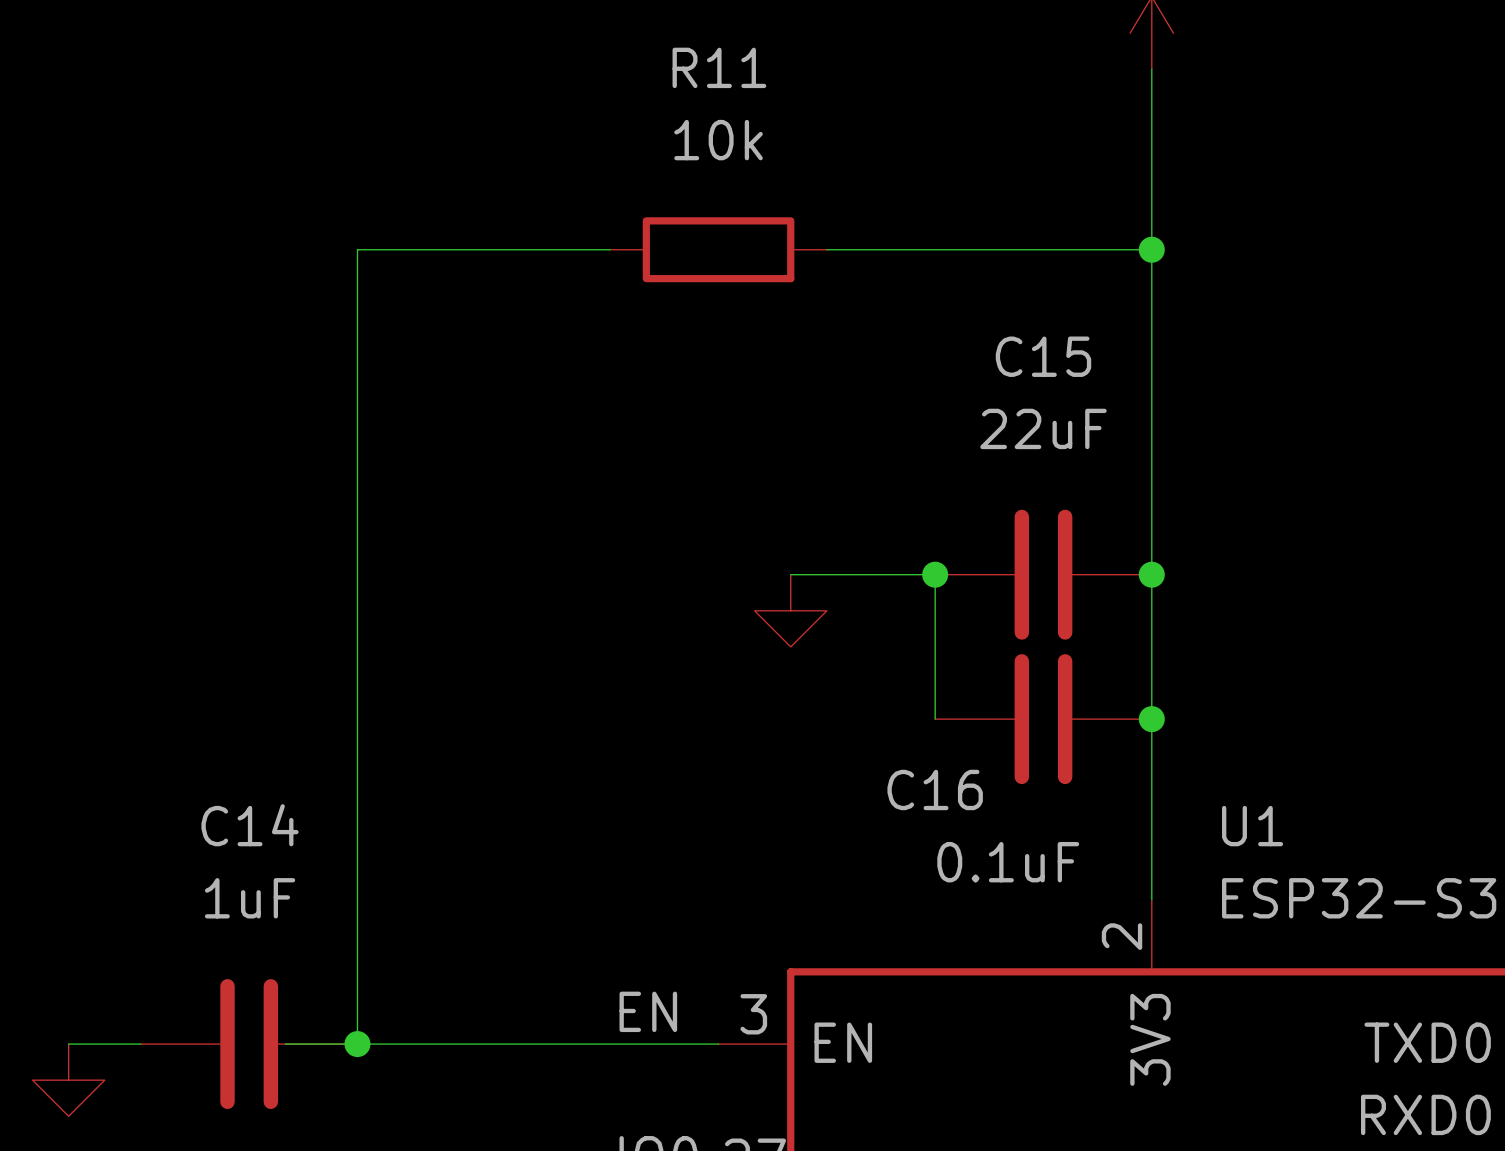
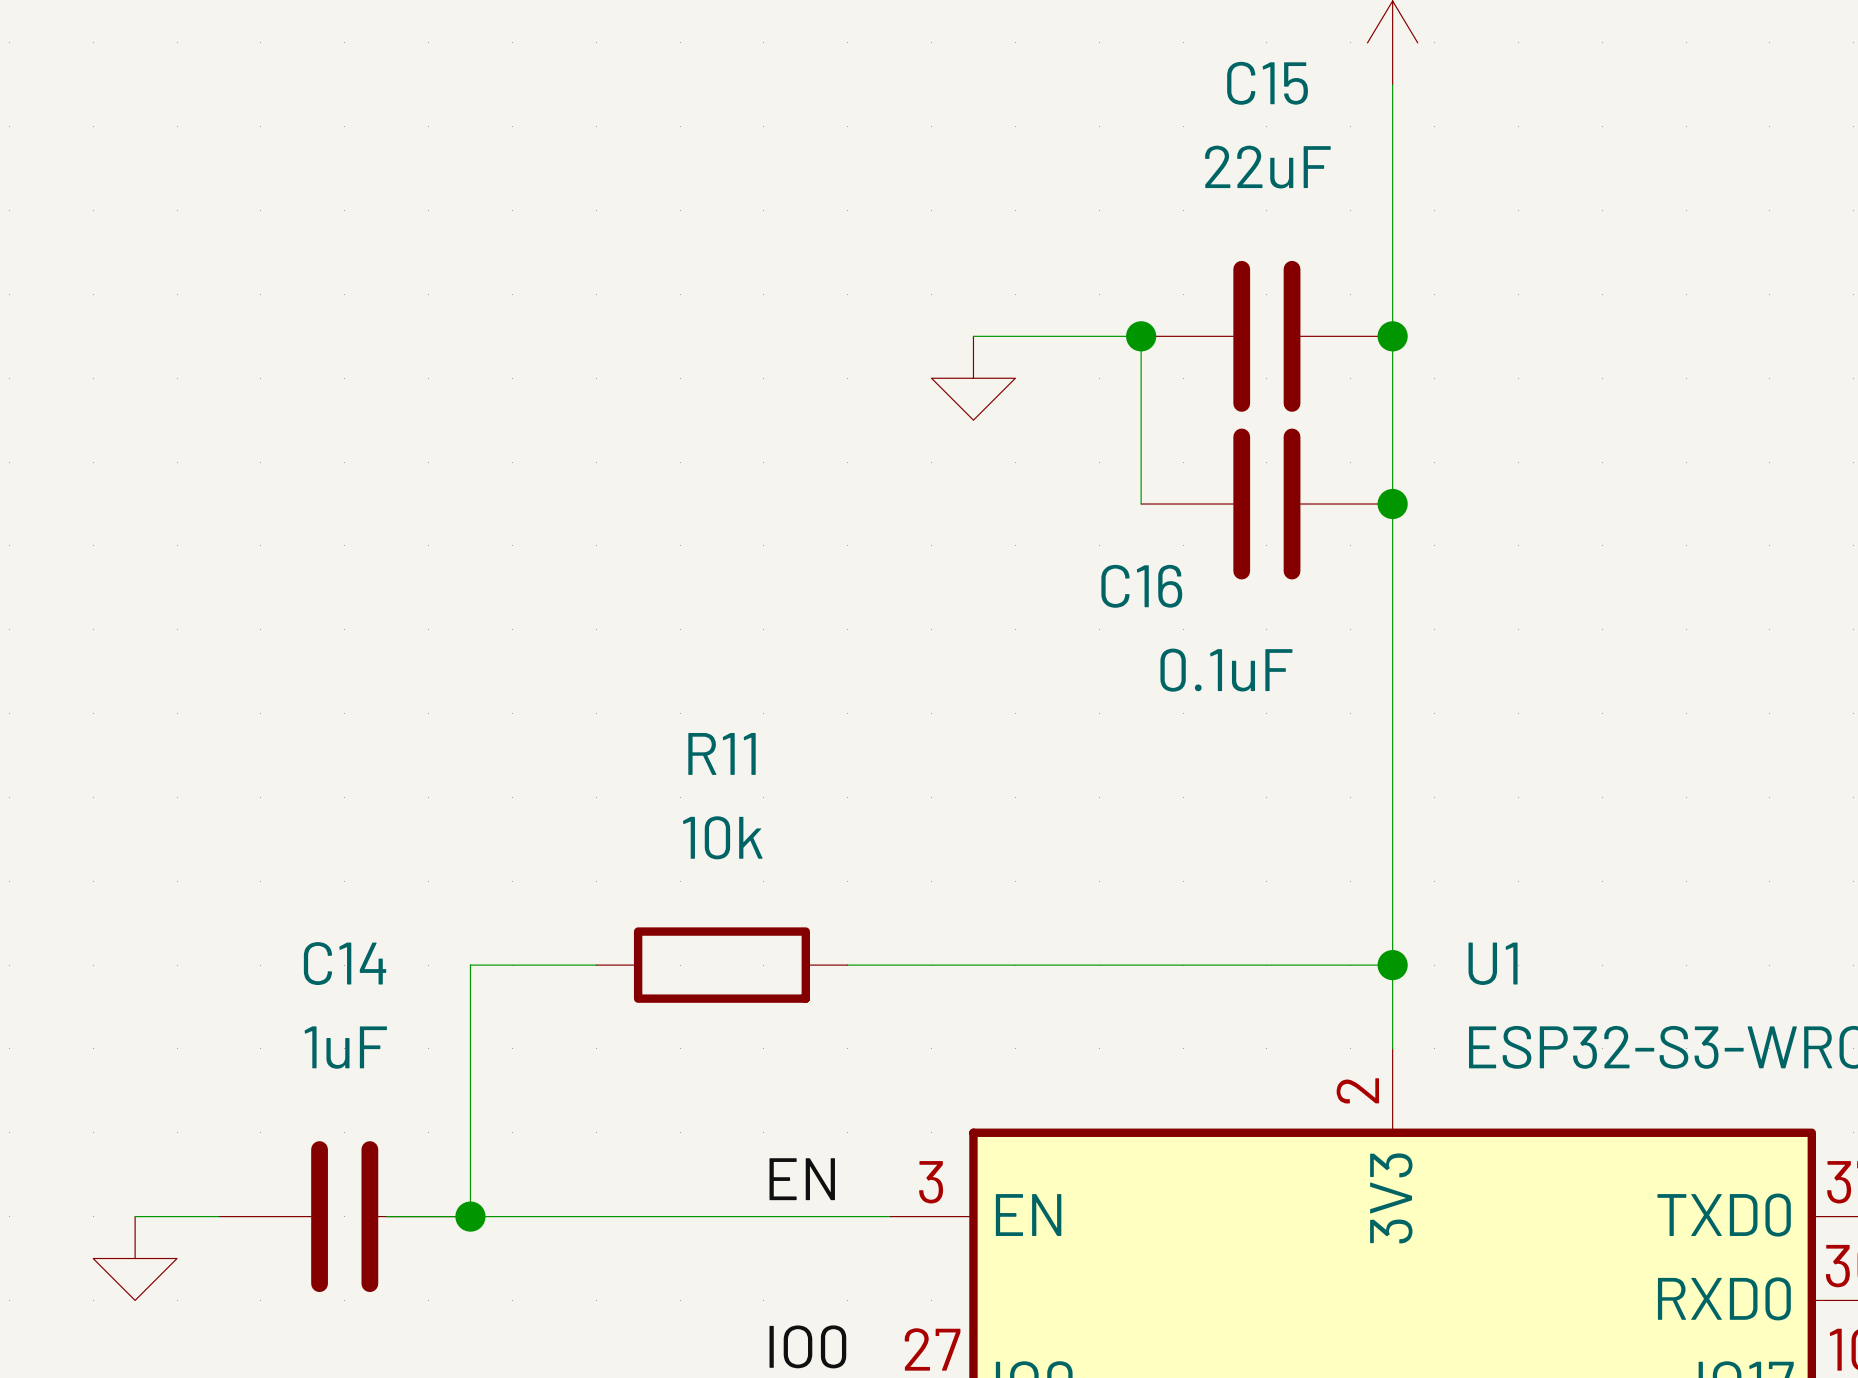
wire: (610, 249) (357, 249) (357, 827) -> (596, 965) (470, 965)
R11 position: (718, 249) -> (721, 965)
wire: (826, 249) (1151, 249) -> none
junction position: (1151, 249) -> (1392, 336)
junction: none -> (1141, 336)
junction: none -> (1392, 504)
wire: (790, 574) (935, 574) (935, 719) -> (973, 336) (1141, 336) (1141, 504)
junction: (935, 574) -> none
C15 position: (1043, 574) -> (1266, 336)
junction: (1151, 574) -> none
power symbol position: (790, 610) -> (973, 378)
C16 position: (1043, 719) -> (1266, 504)
junction position: (1151, 719) -> (1392, 965)
wire: none -> (847, 965) (1392, 965)

